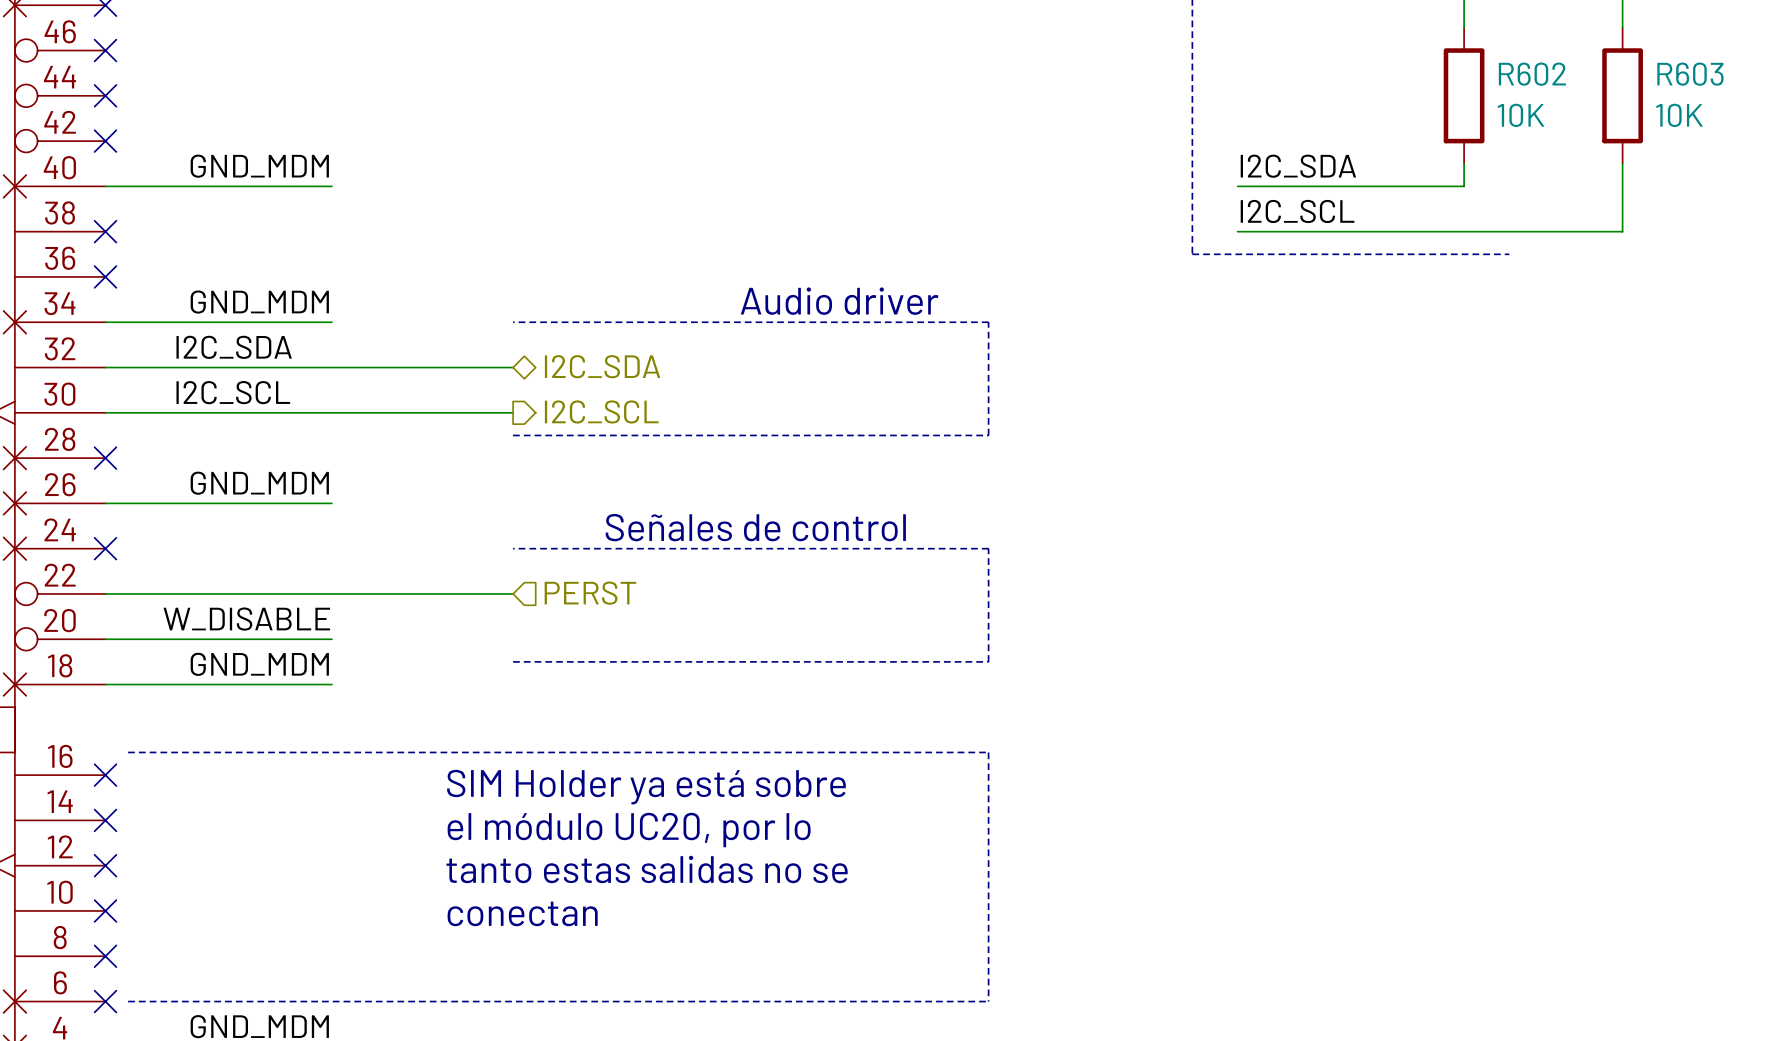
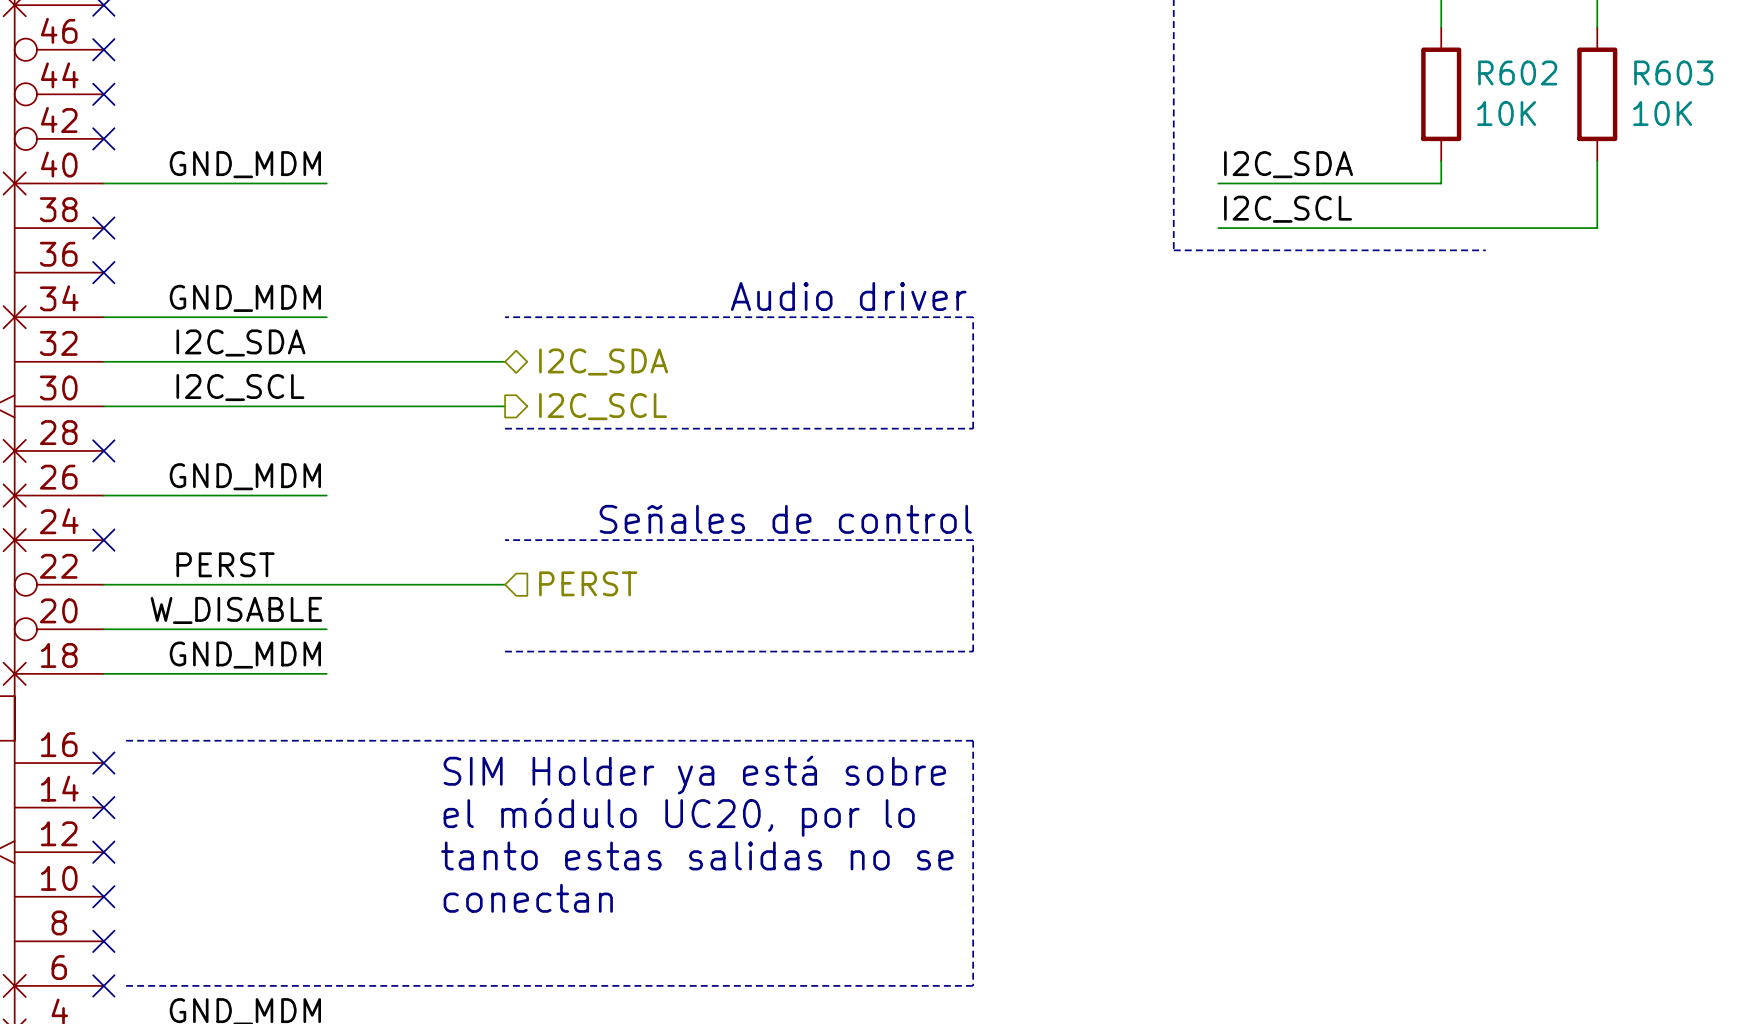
label: none -> PERST (225, 564)

